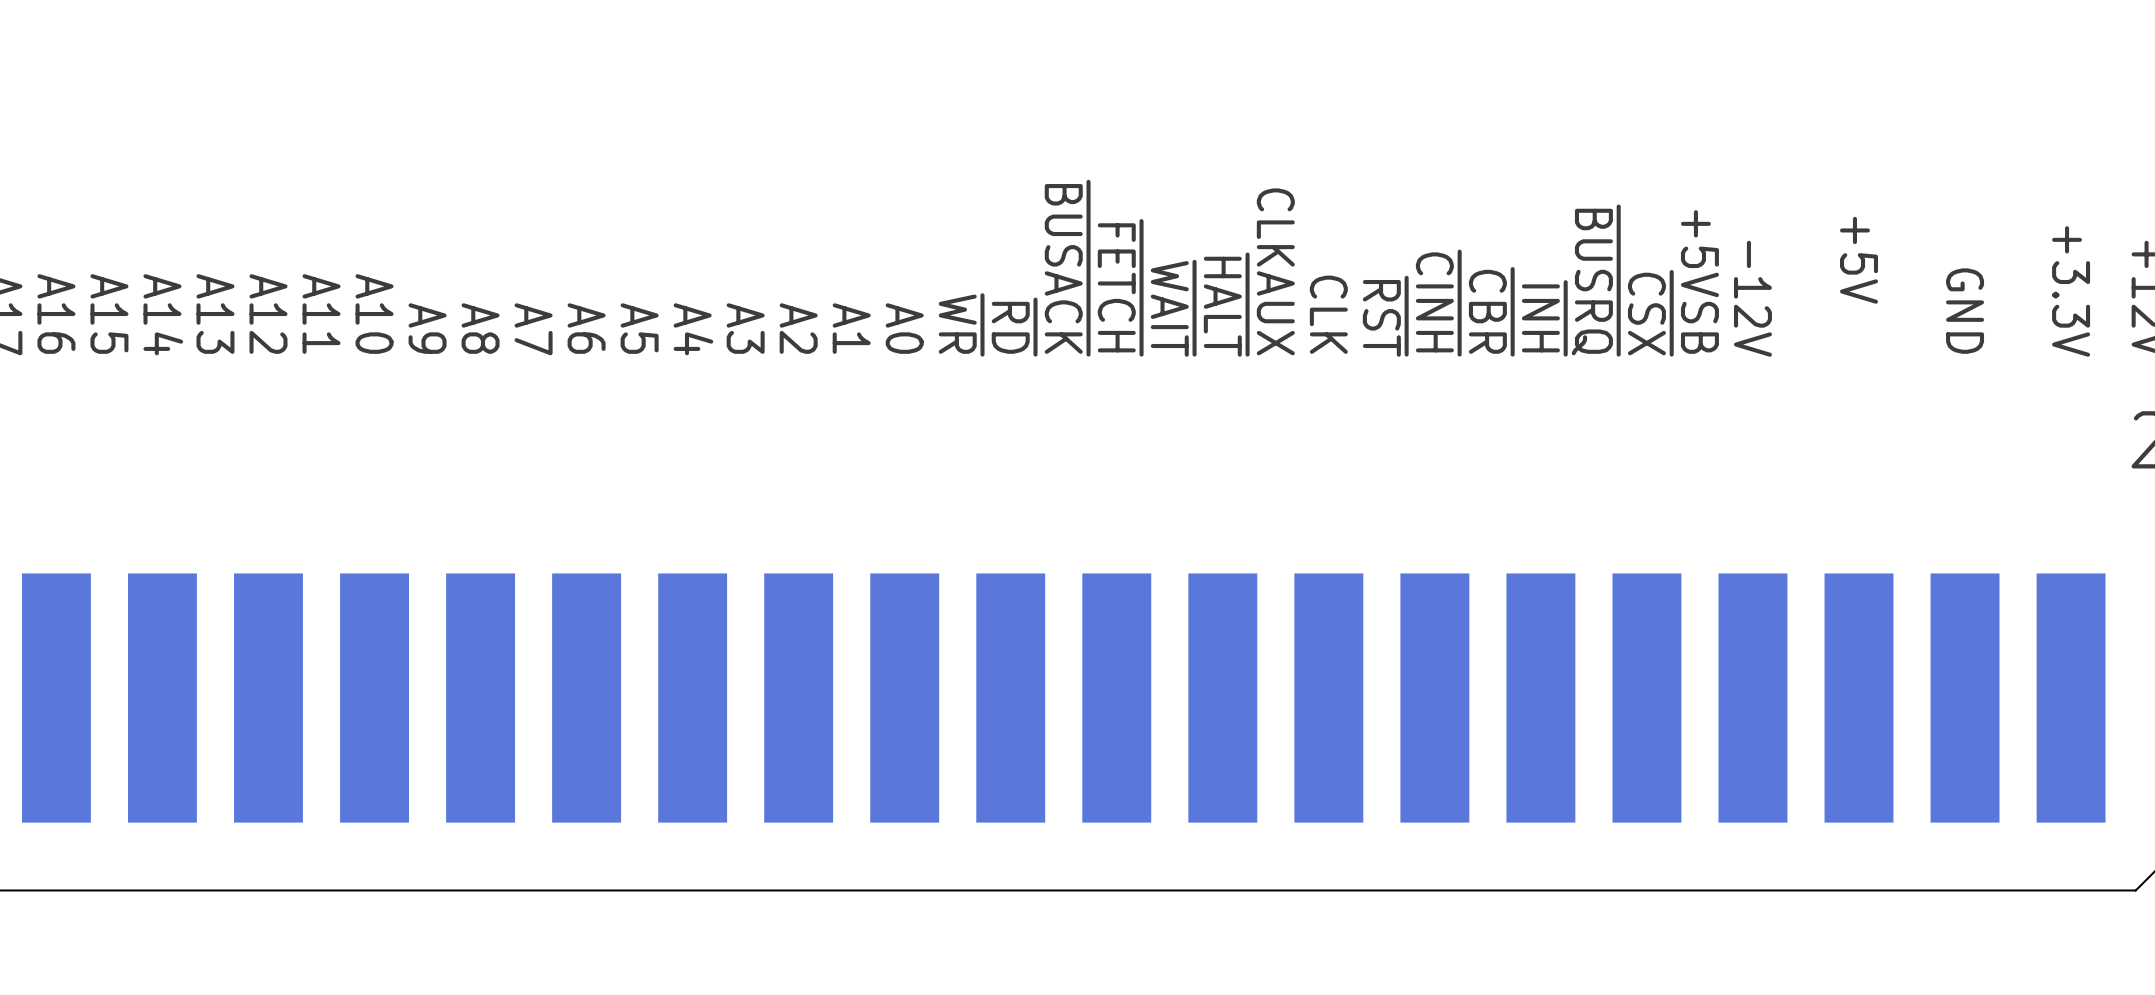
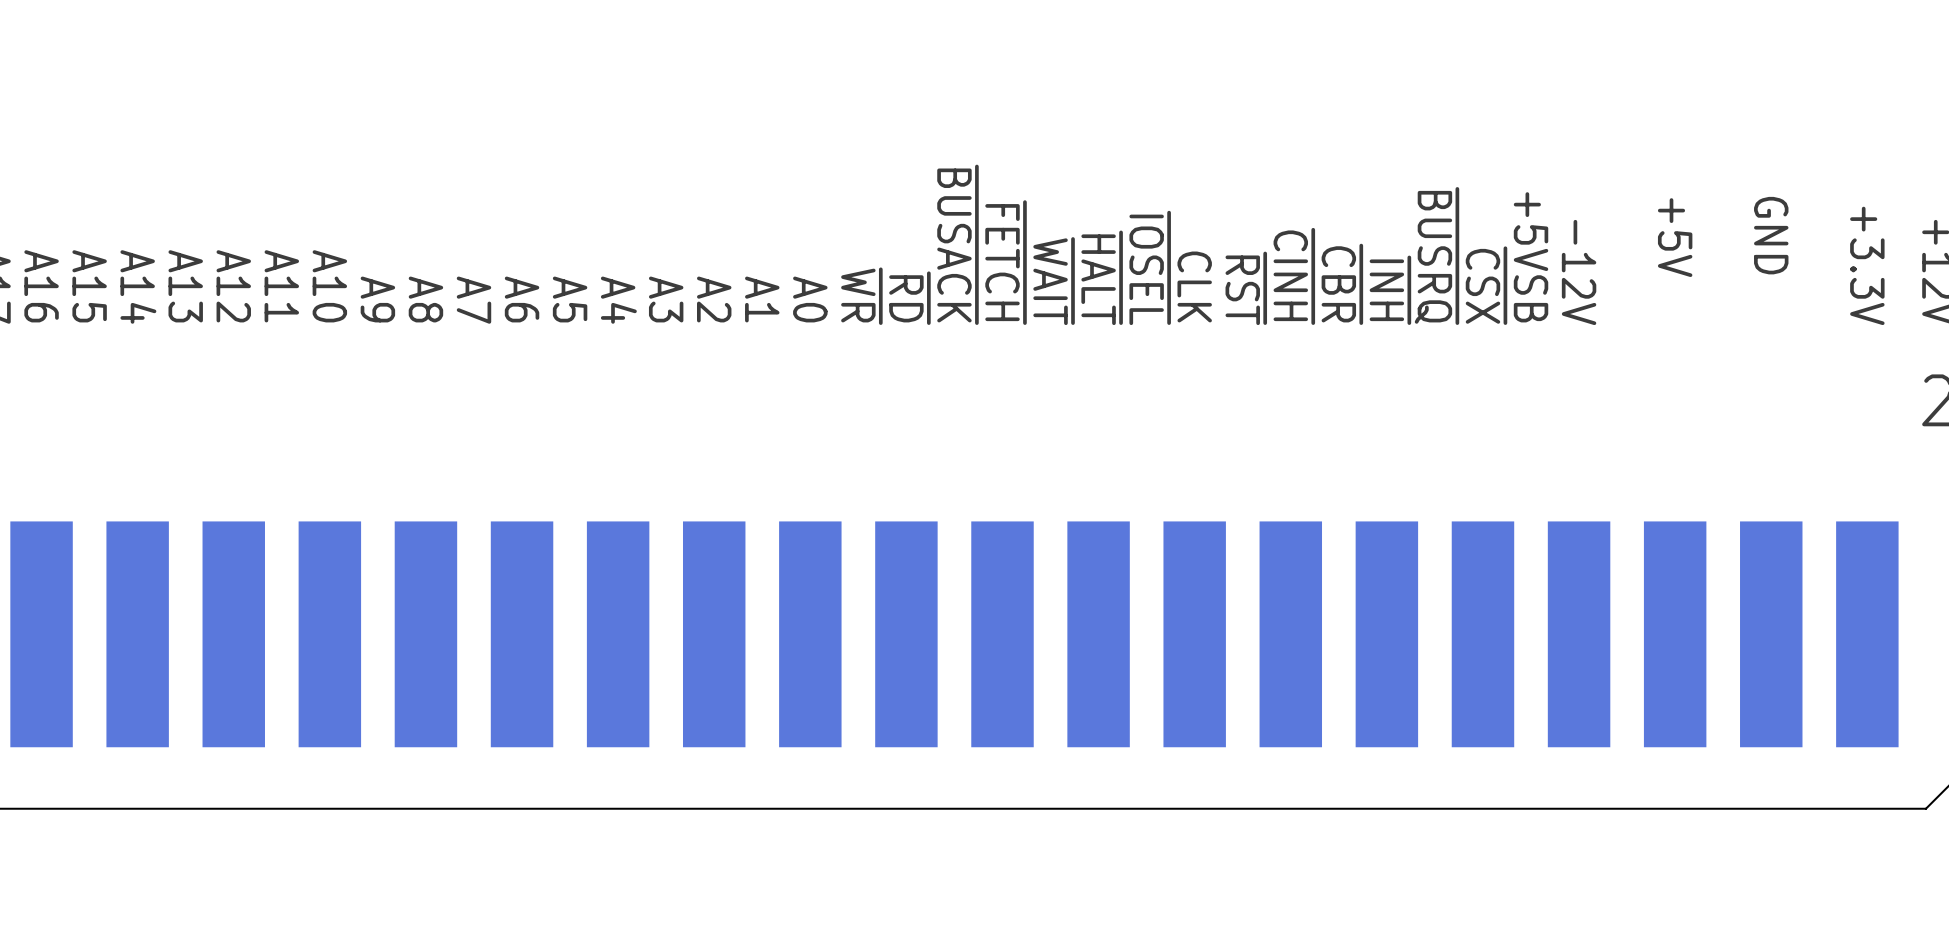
text: CLKAUX (1275, 271) -> ~{IOSEL} (1150, 267)
text position: GND (1965, 311) -> GND (1771, 235)

